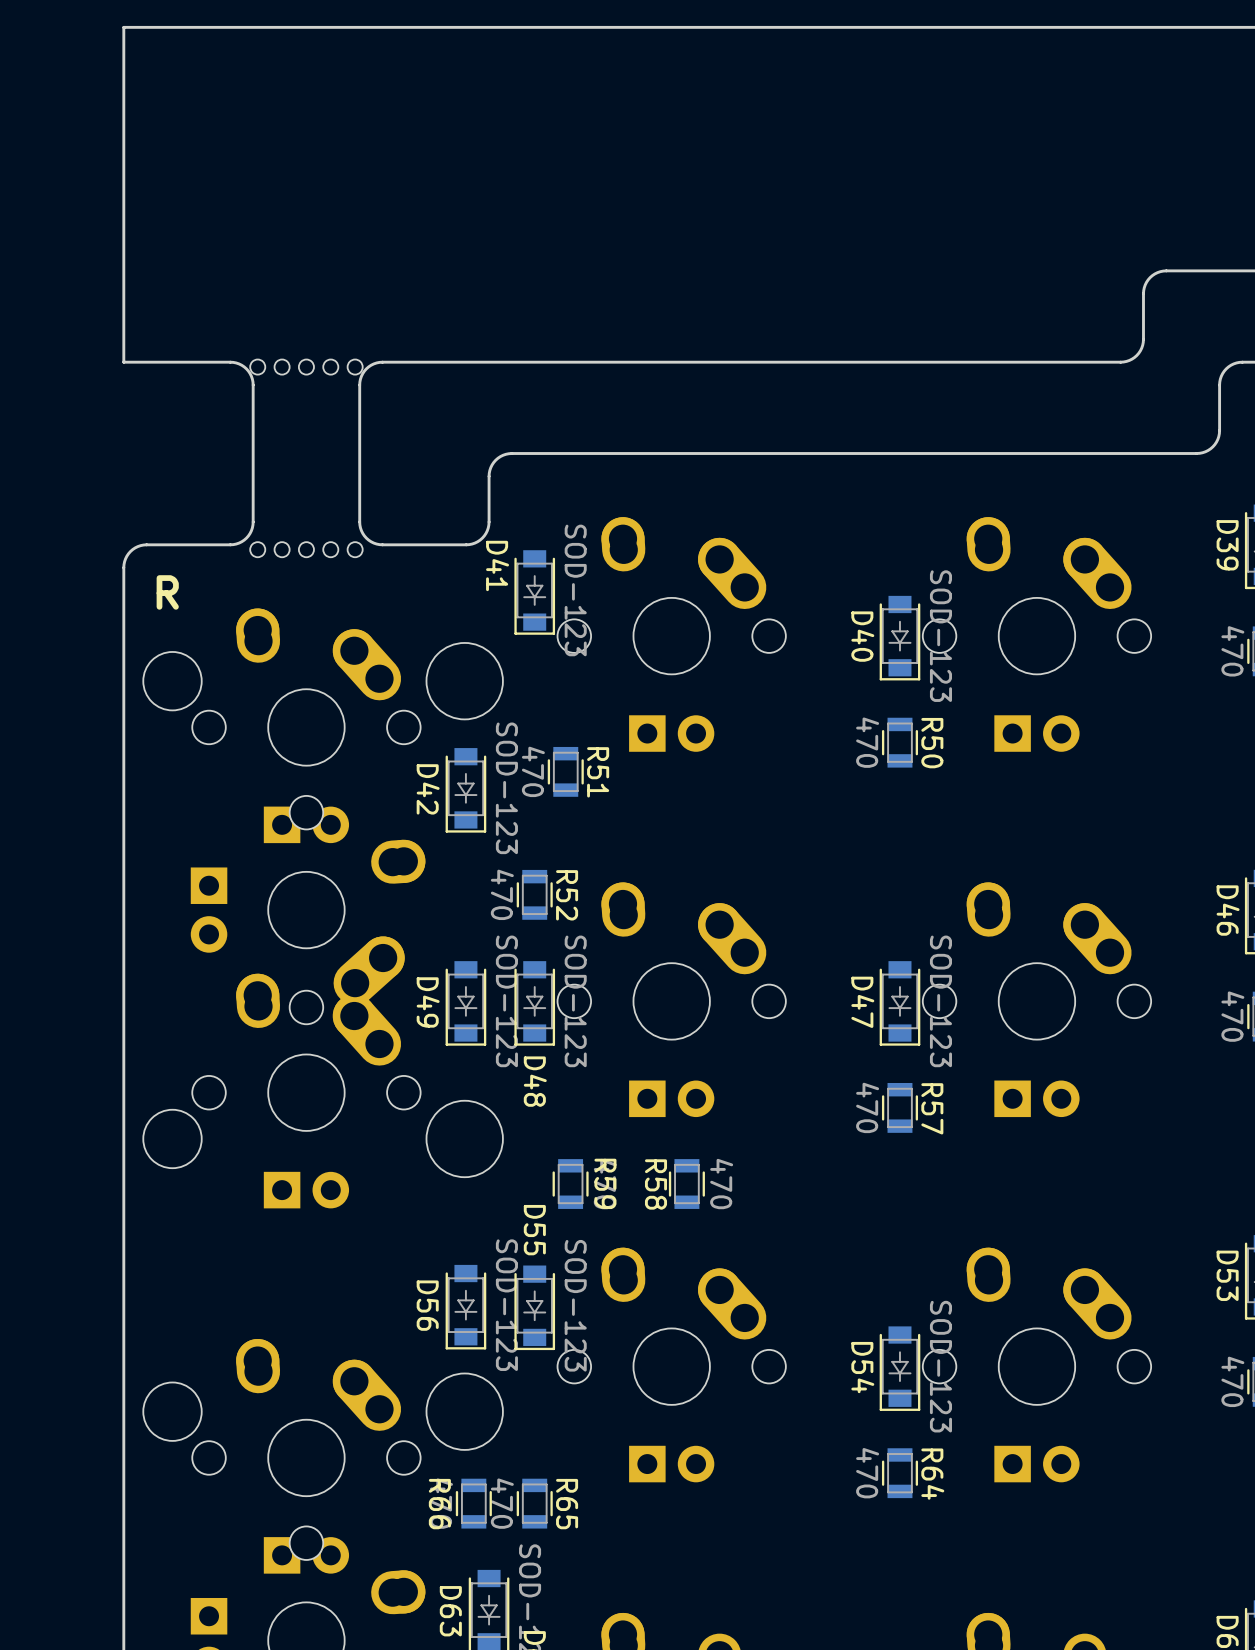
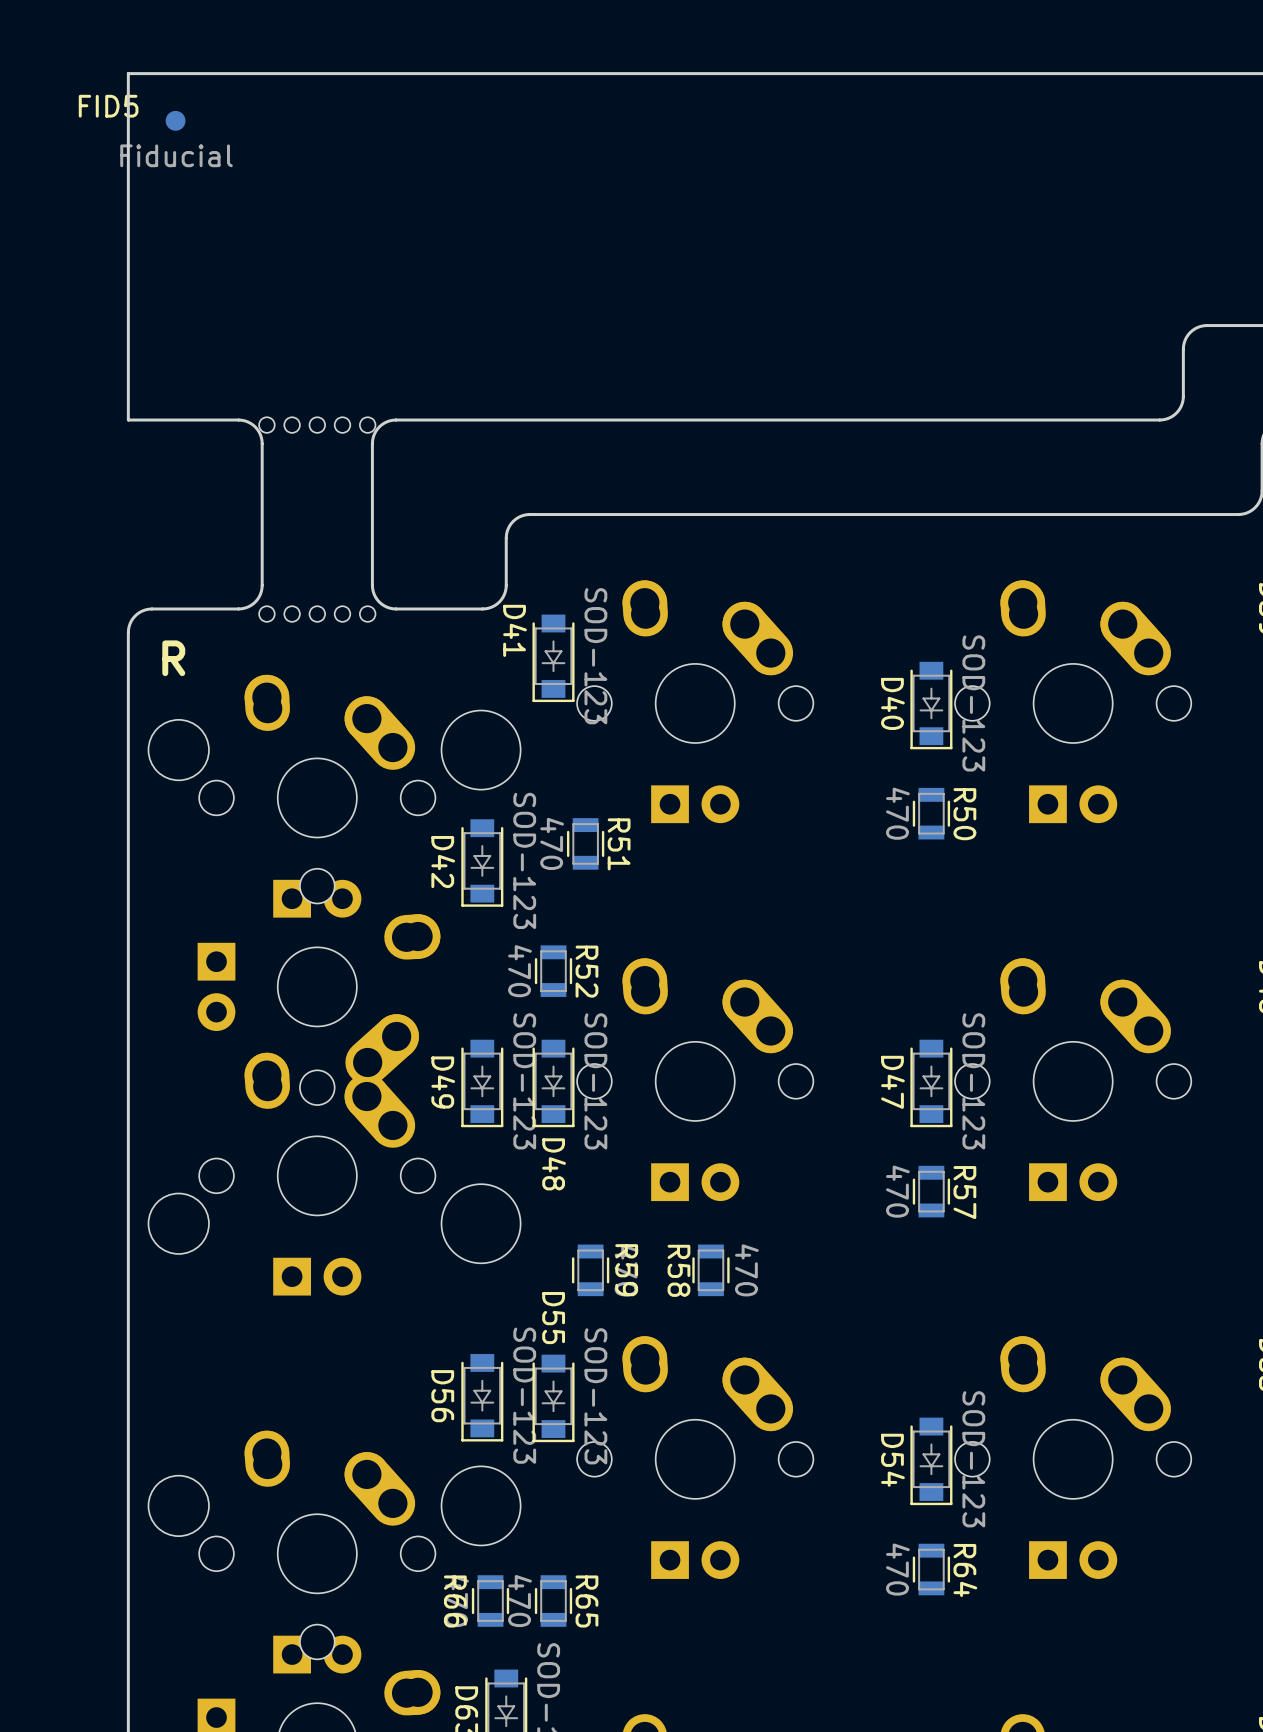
FID5: none -> Fiducial (175, 120)

